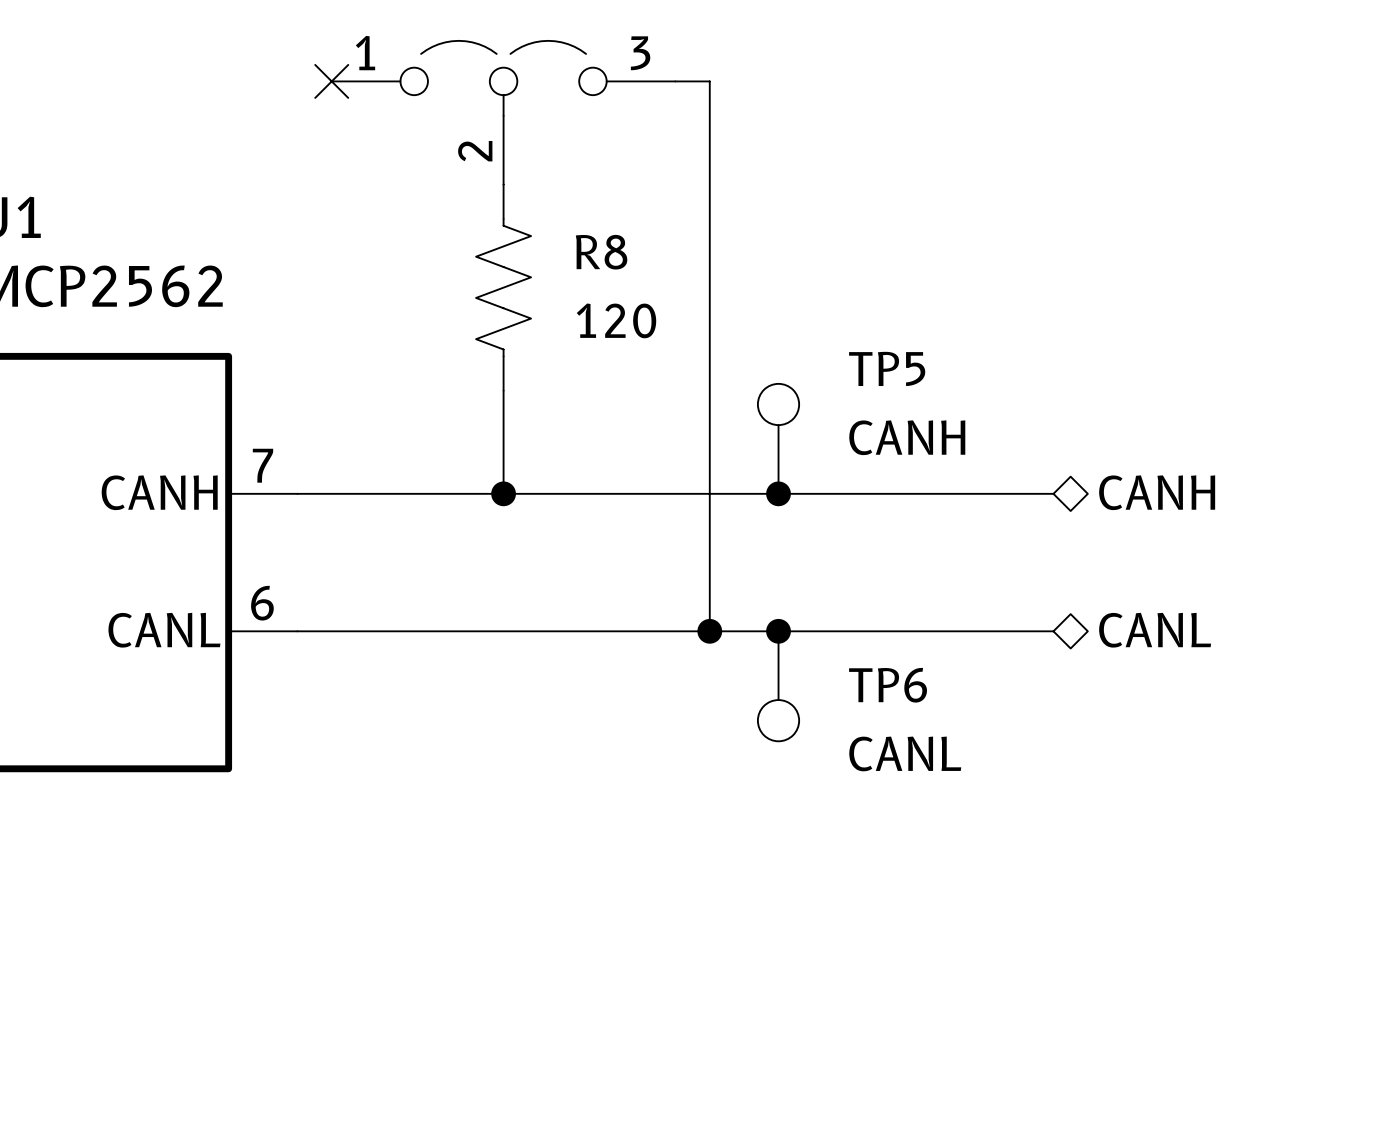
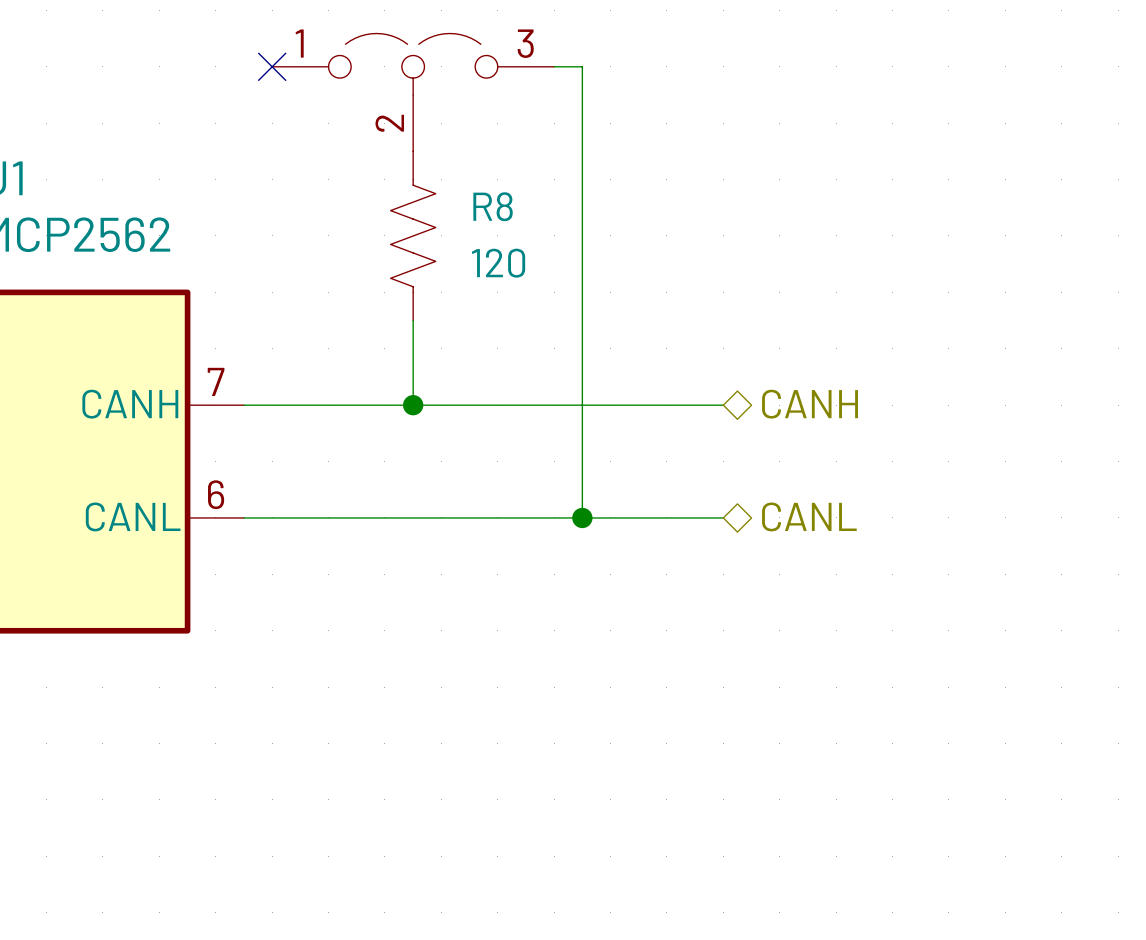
TP5: CANH (778, 438) -> none
hierarchical label position: CANH (1157, 492) -> CANH (810, 404)
junction: (778, 493) -> none
wire: (881, 493) (1053, 493) -> none
hierarchical label position: CANL (1155, 630) -> CANL (809, 516)
junction: (778, 631) -> none
wire: (881, 631) (1053, 631) -> none
TP6: CANL (778, 686) -> none

